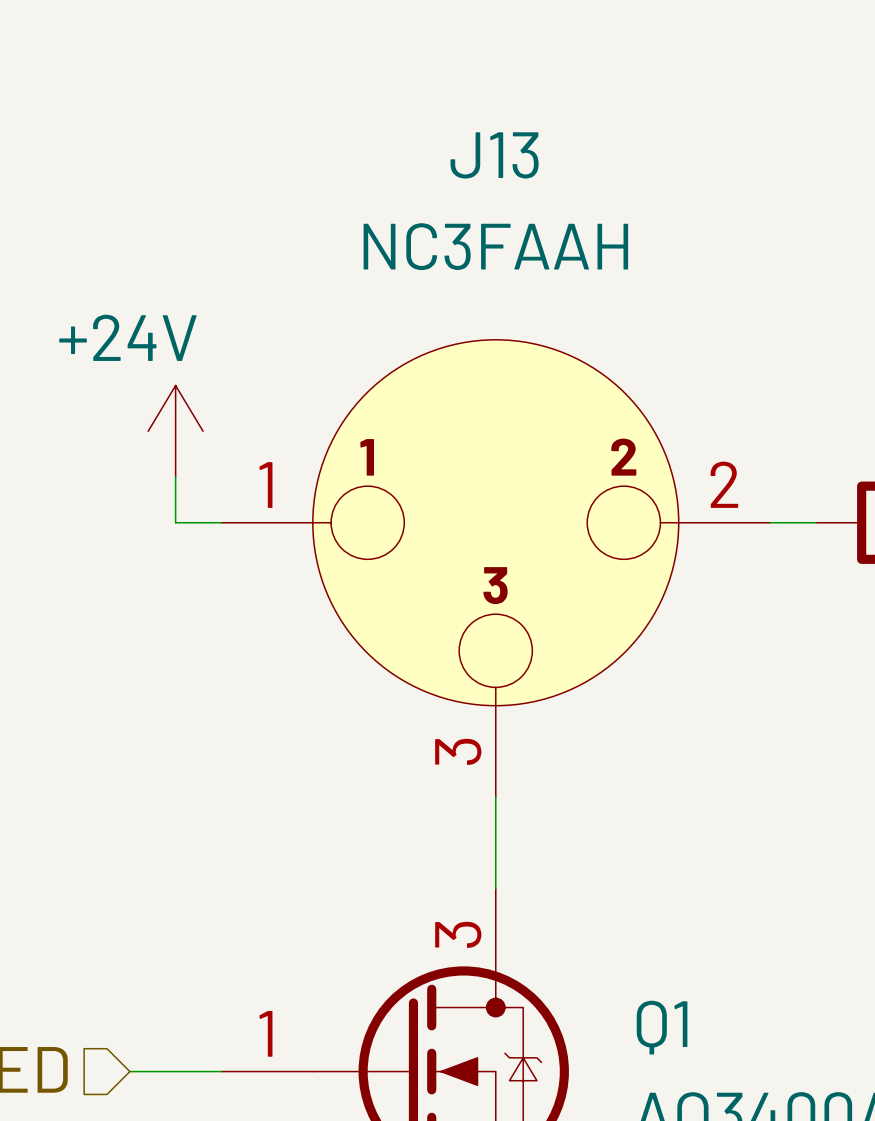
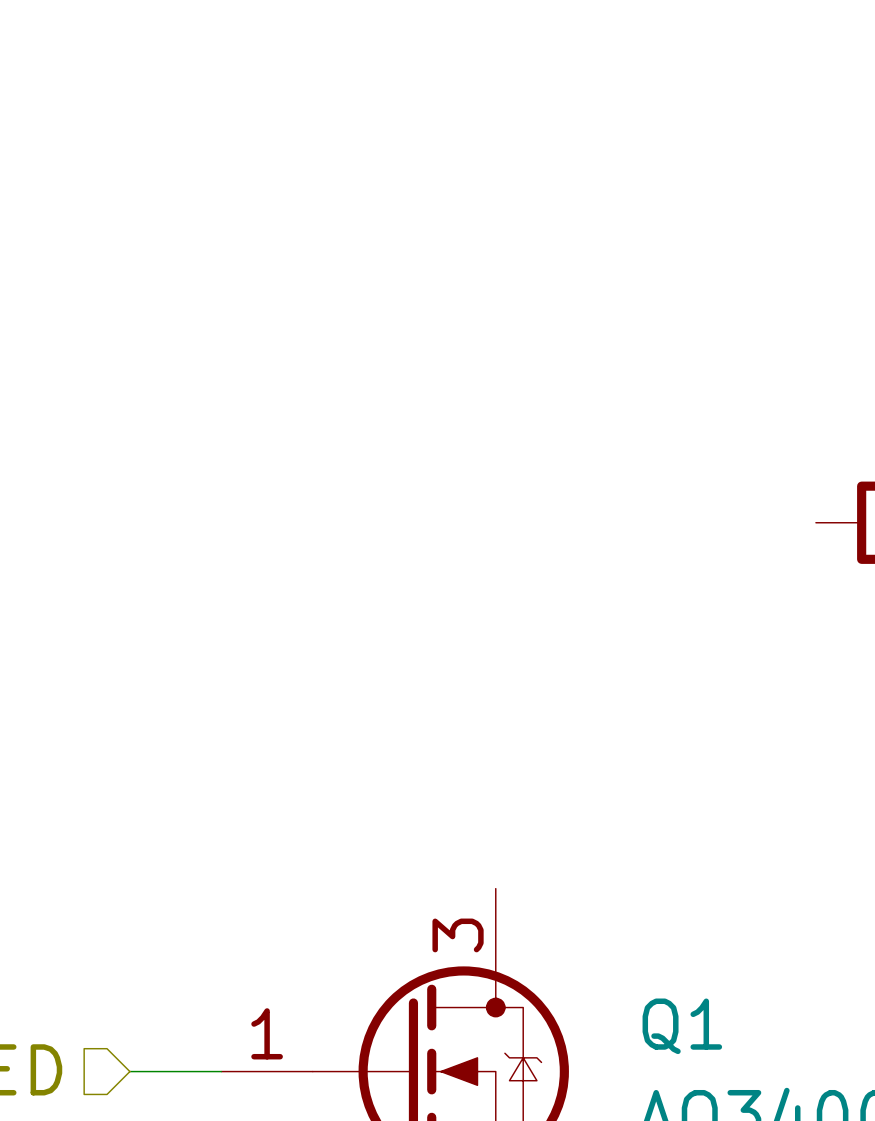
power symbol: +24V (175, 431) -> none
wire: (175, 477) (175, 522) (221, 522) -> none
wire: (770, 522) (815, 522) -> none
J13: NC3FAAH (495, 568) -> none
wire: (495, 797) (495, 888) -> none

